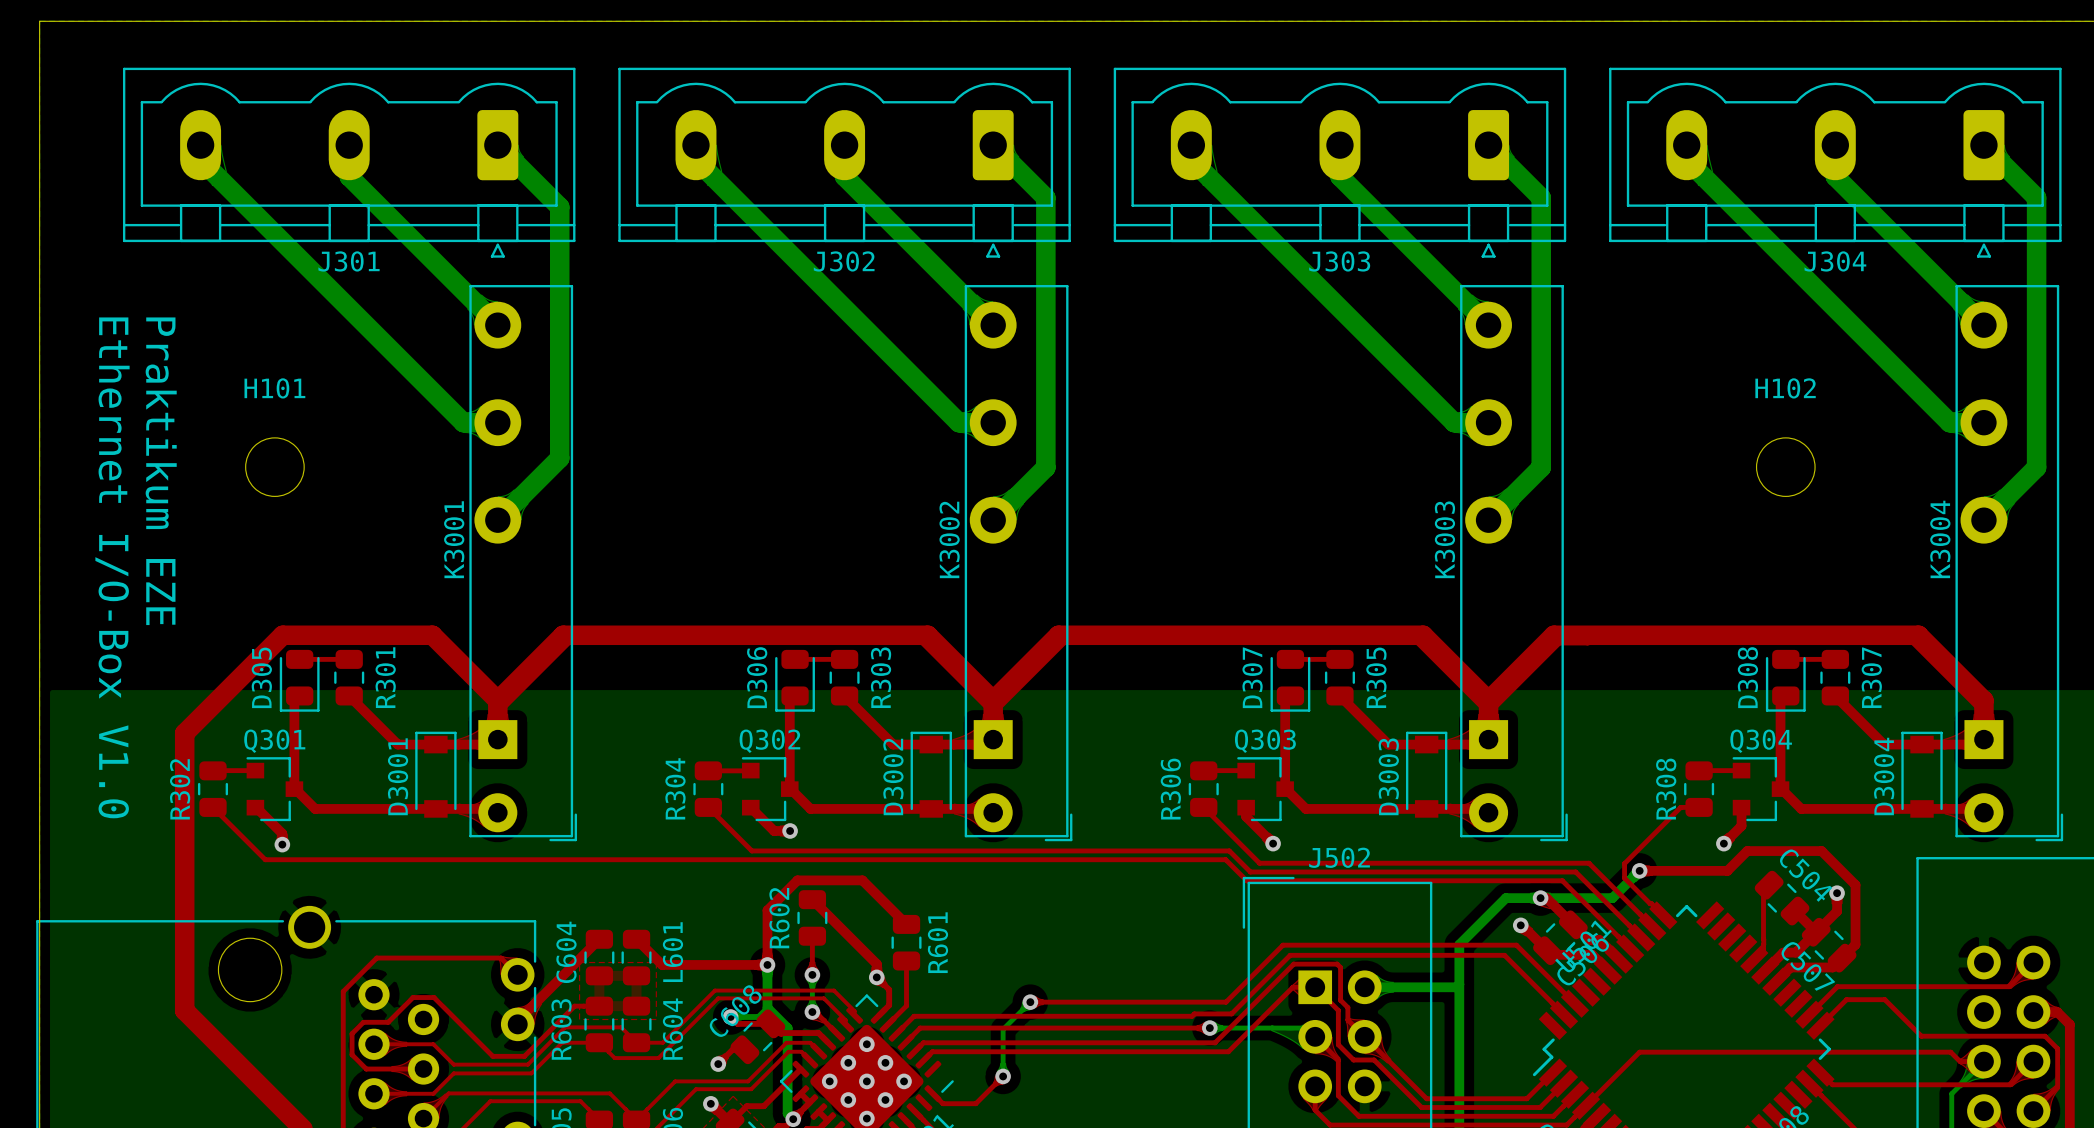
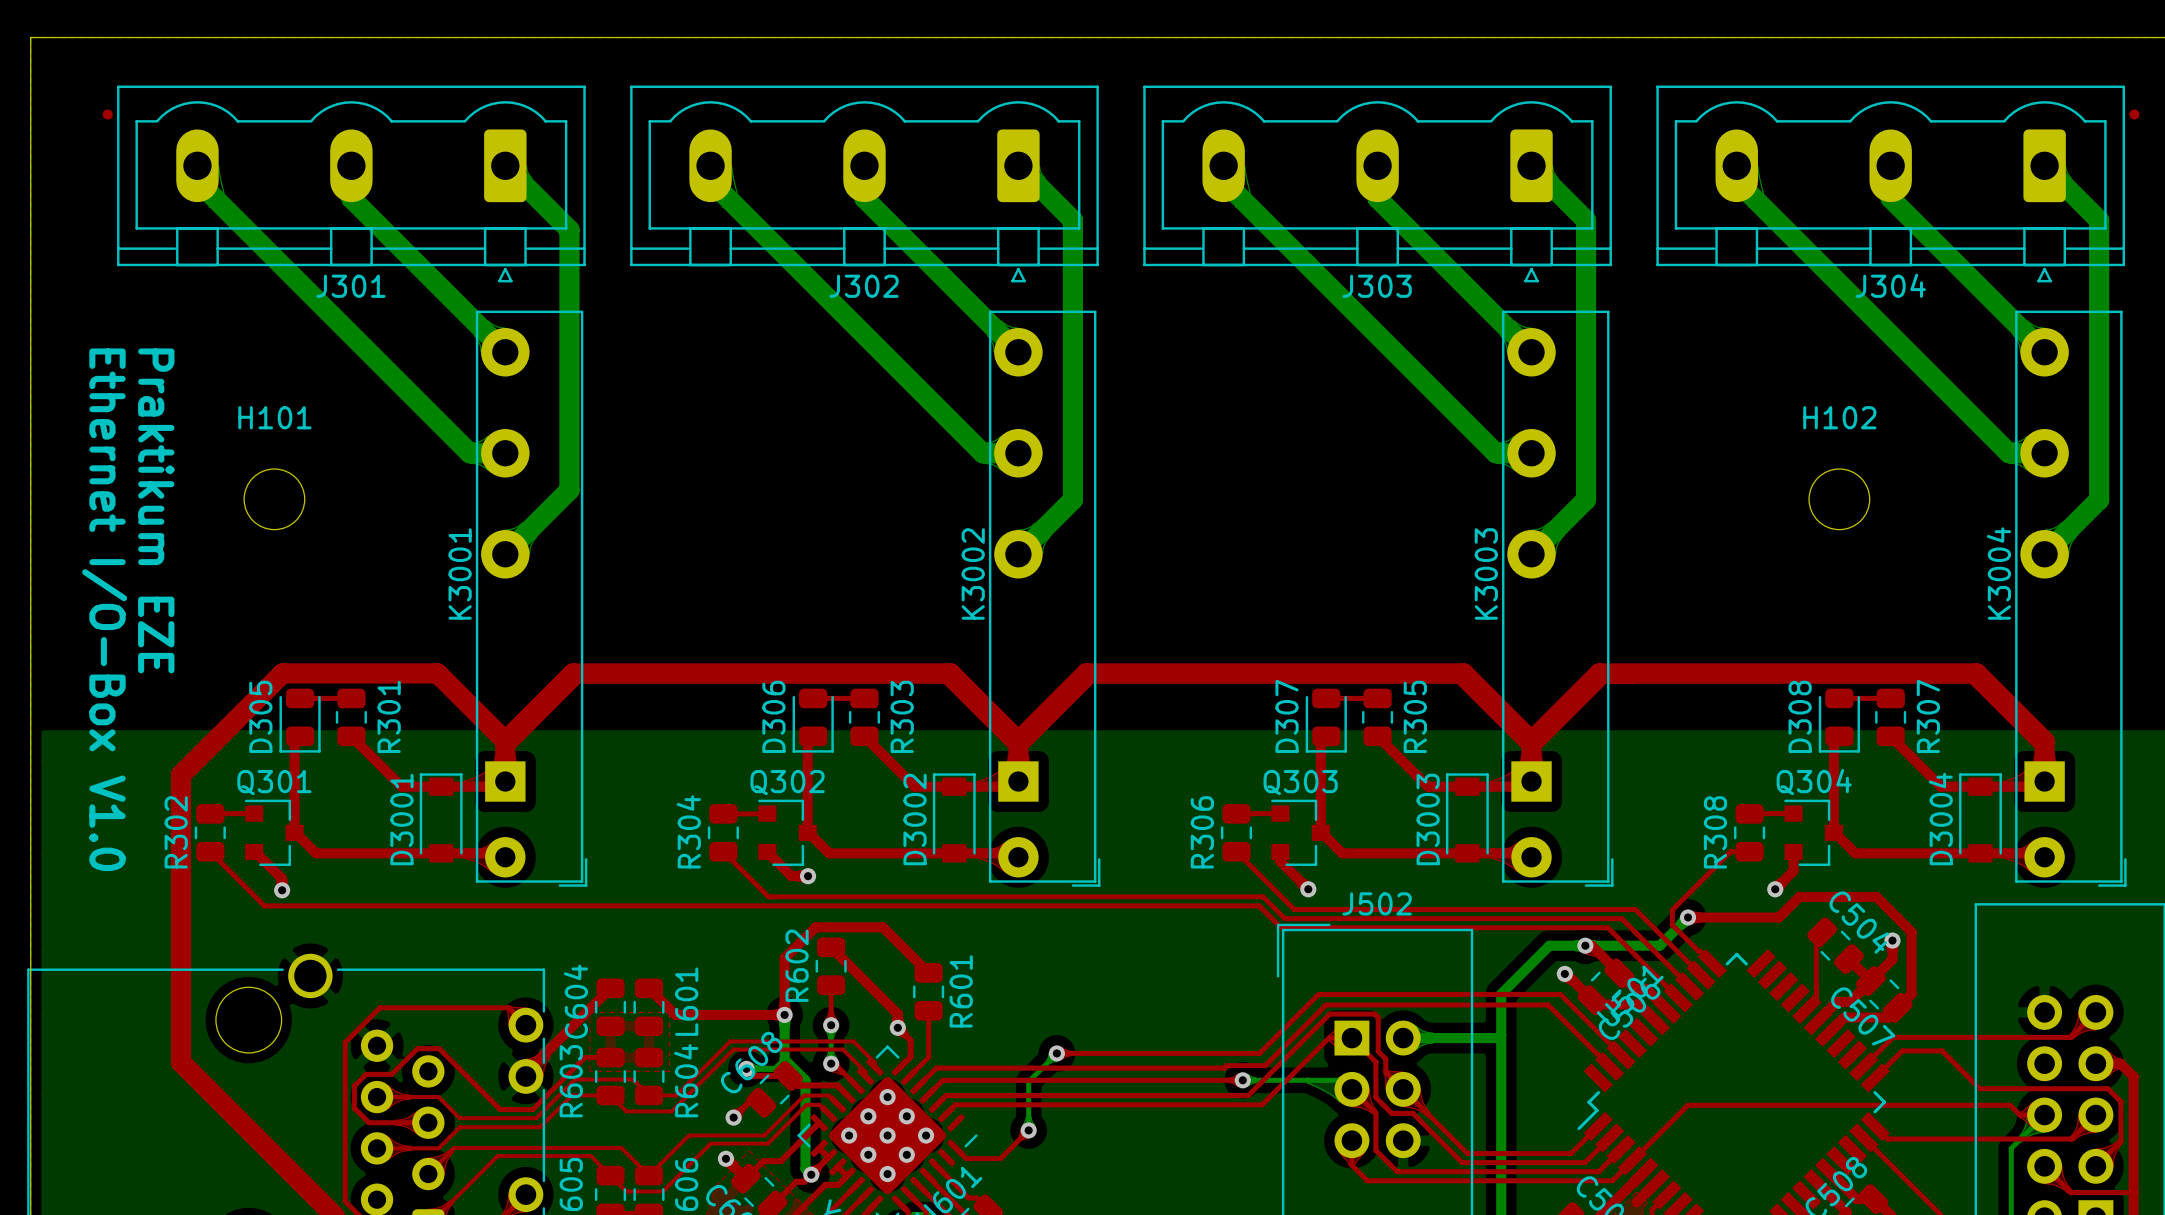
part: none -> (107, 114)
part: none -> (2134, 114)

